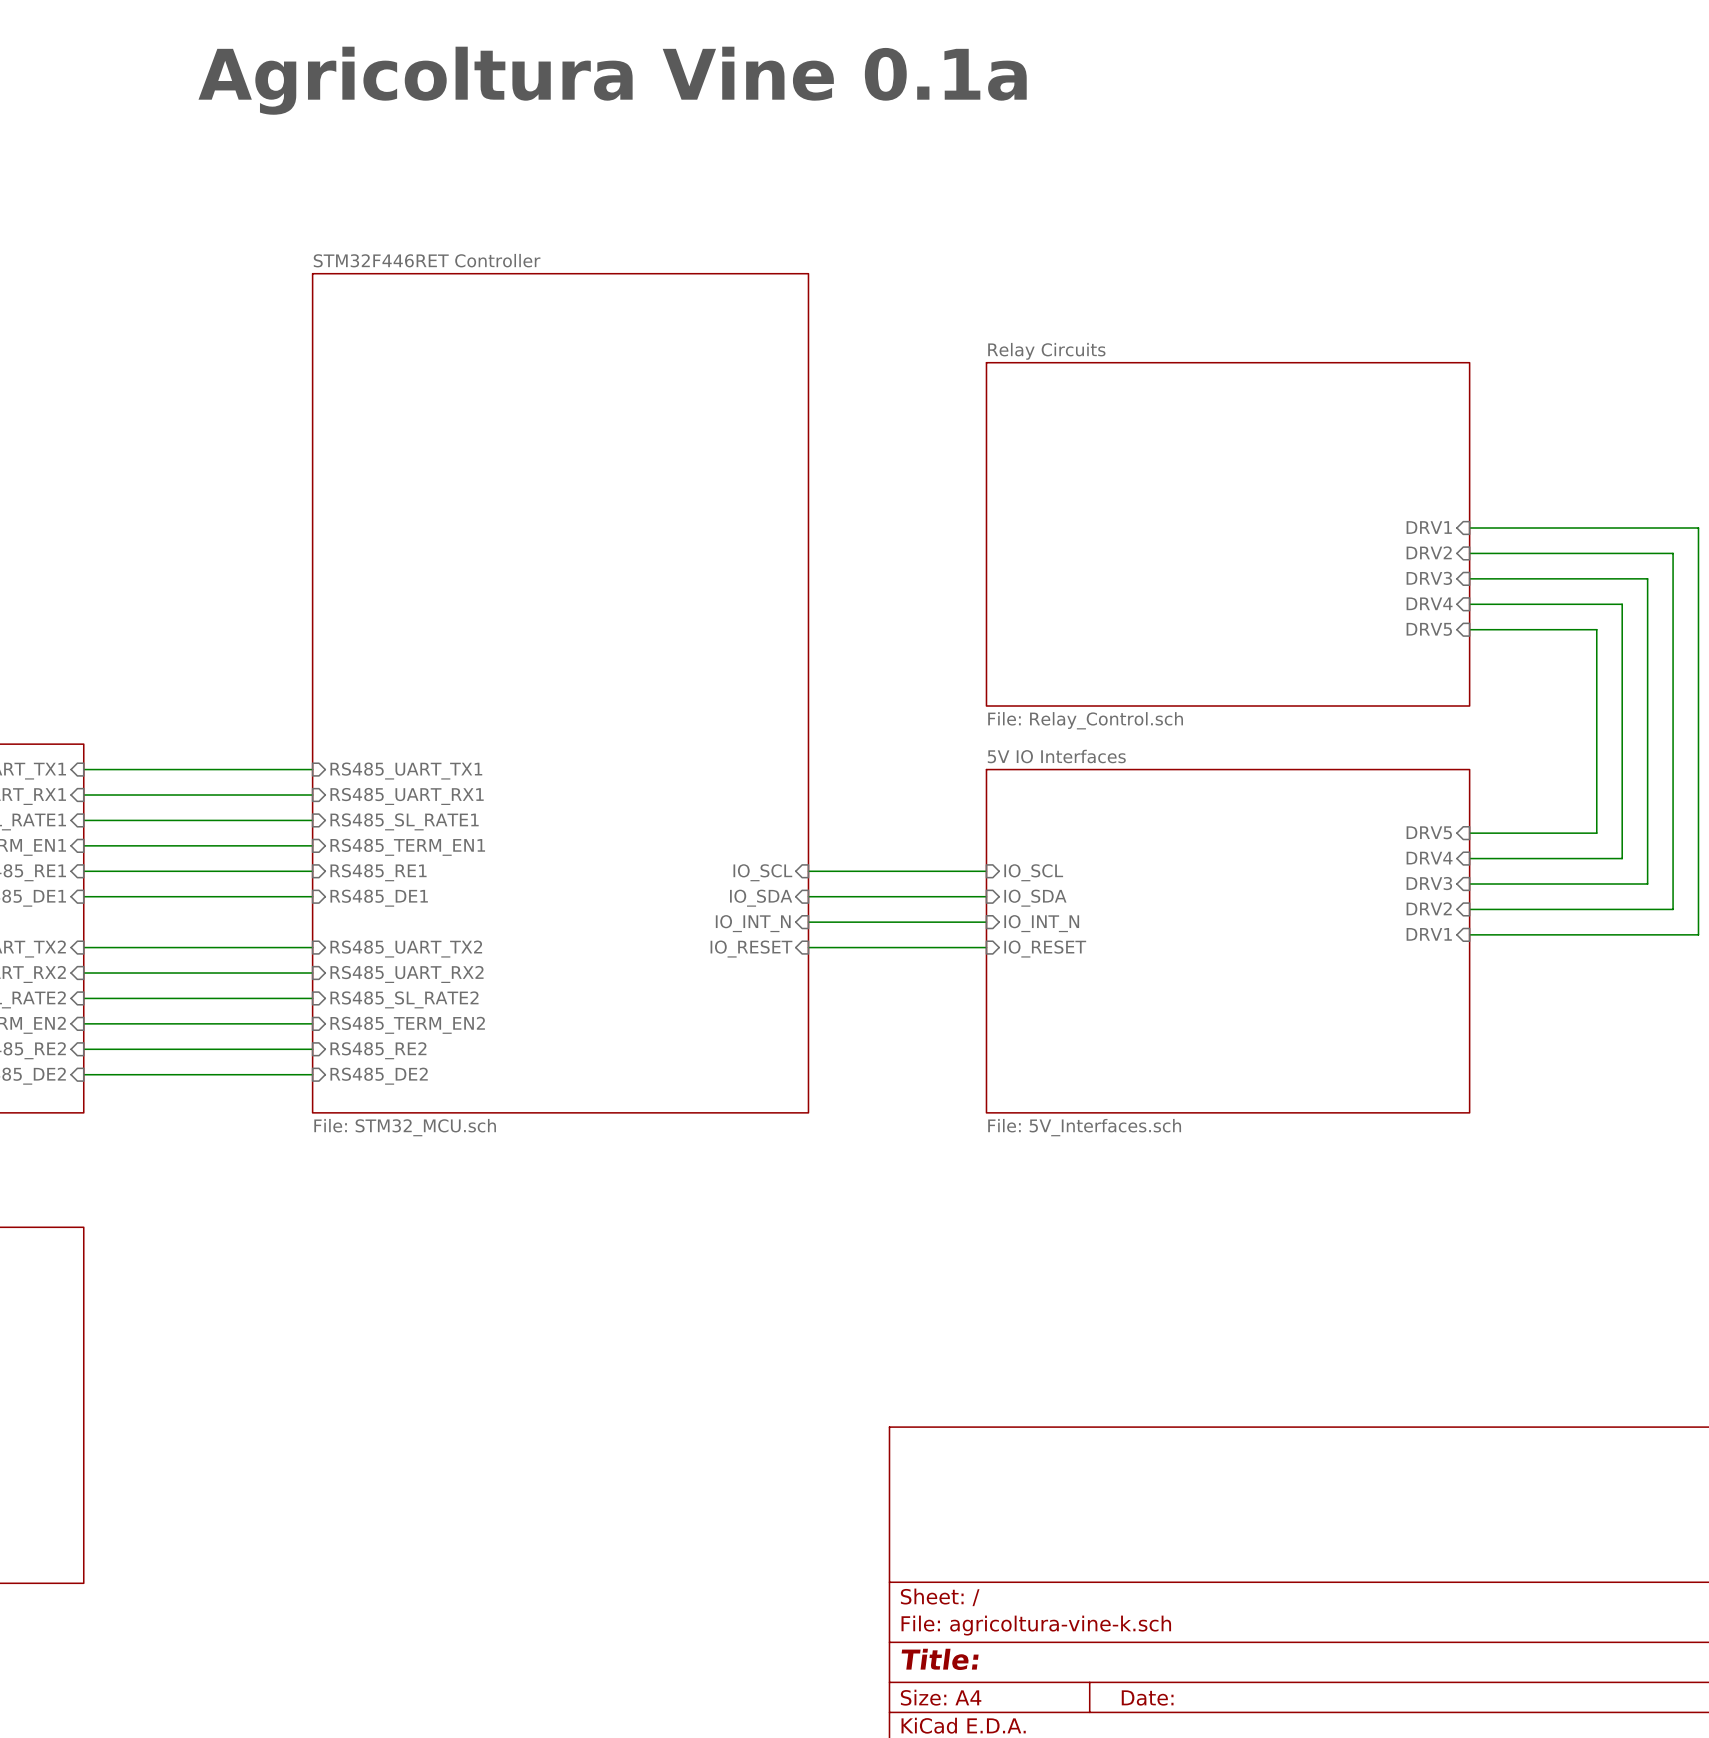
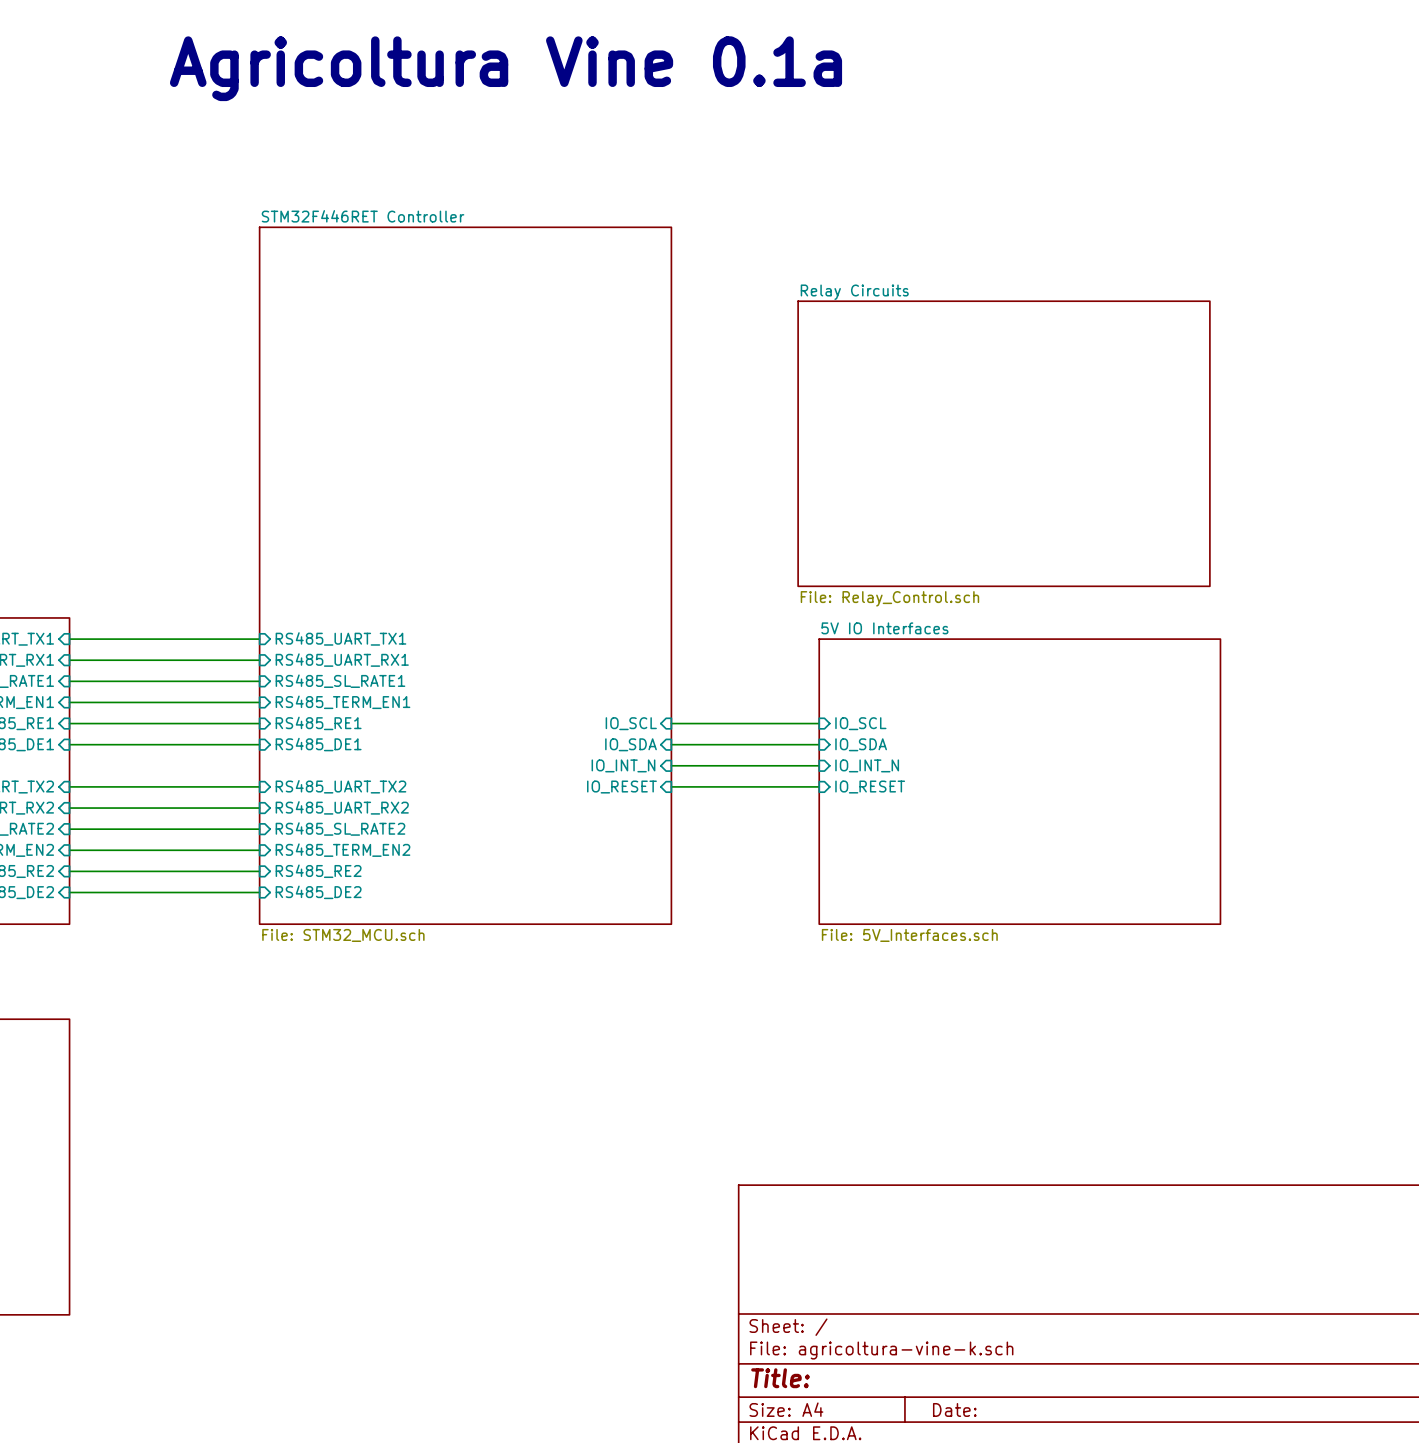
sheet pin: DRV1 (1429, 527) -> none
wire: (1469, 528) (1698, 528) (1698, 934) (1469, 934) -> none
sheet Relay Circuits: none -> File: Relay_Control.sch (1004, 443)
sheet Relay Circuits: File: Relay_Control.sch (1228, 534) -> none
sheet pin: DRV2 (1429, 552) -> none
wire: (1469, 553) (1673, 553) (1673, 909) (1469, 909) -> none
sheet pin: DRV3 (1429, 578) -> none
wire: (1469, 578) (1647, 578) (1647, 884) (1469, 884) -> none
sheet pin: DRV4 (1429, 603) -> none
wire: (1469, 604) (1622, 604) (1622, 858) (1469, 858) -> none
sheet pin: DRV5 (1429, 629) -> none
wire: (1469, 629) (1596, 629) (1596, 833) (1469, 833) -> none
sheet pin: DRV5 (1429, 832) -> none
sheet pin: DRV4 (1429, 858) -> none
sheet pin: DRV3 (1429, 883) -> none
sheet pin: DRV2 (1429, 908) -> none
sheet pin: DRV1 (1429, 934) -> none

